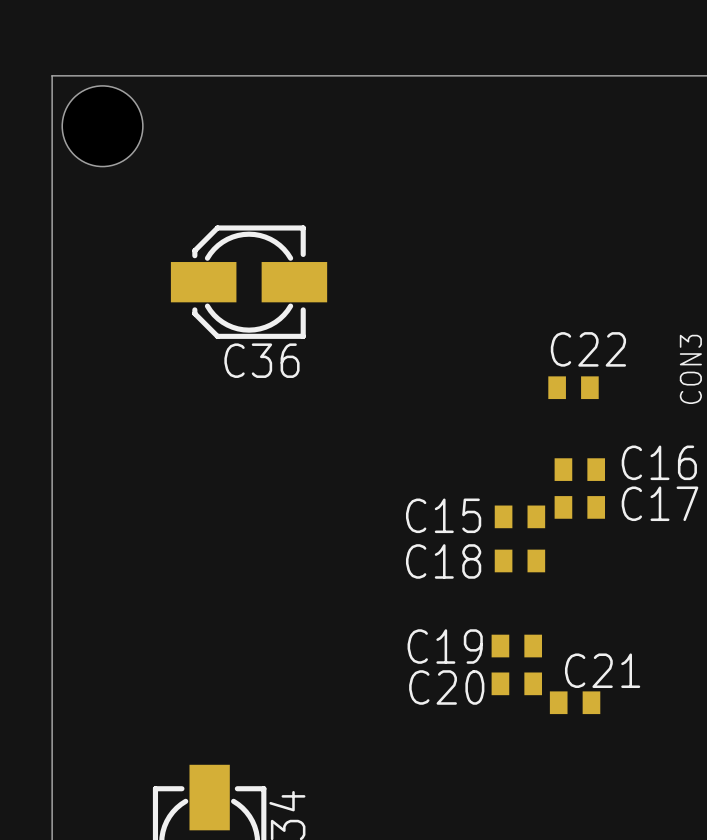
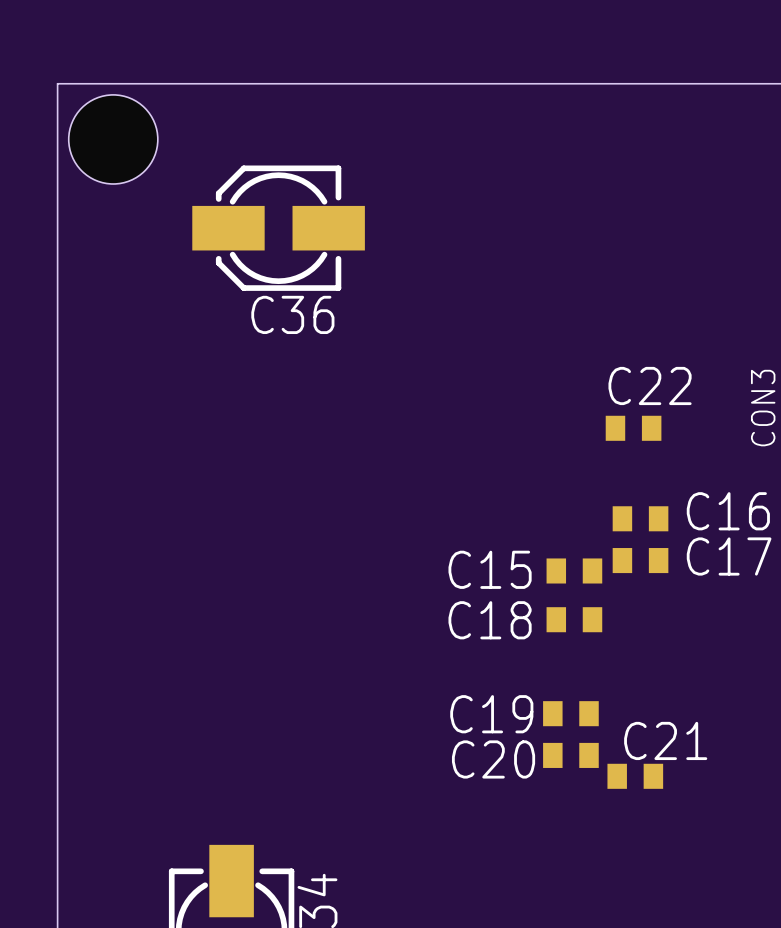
C36 position: (249, 282) -> (278, 228)

